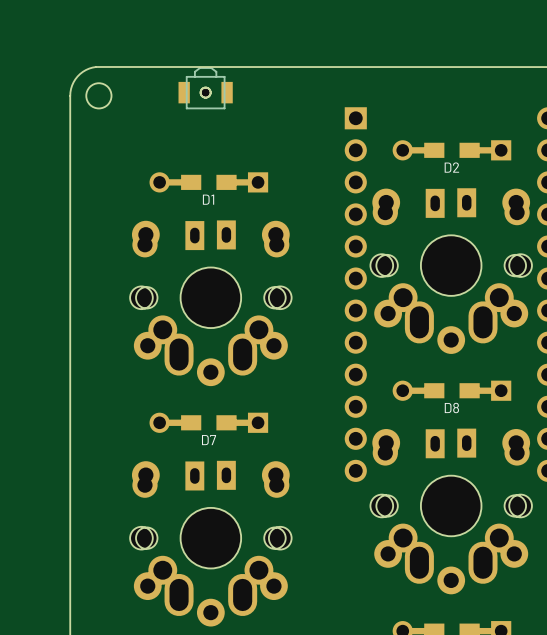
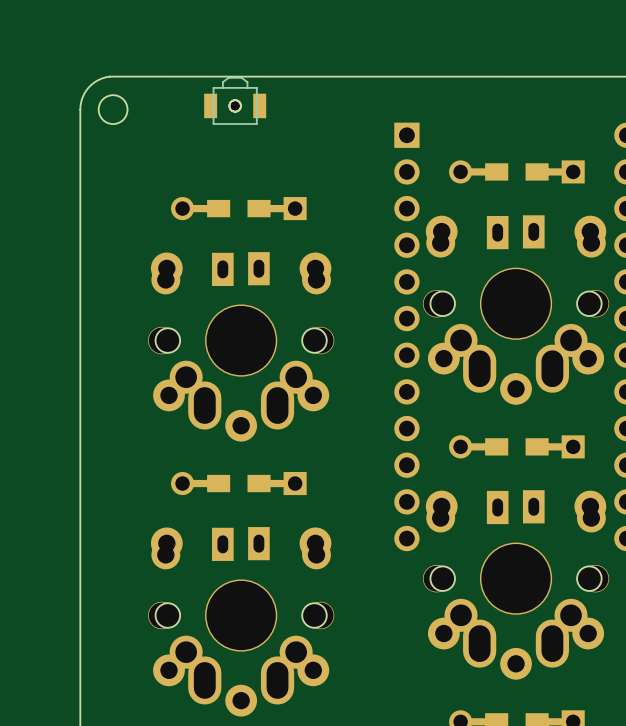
D2 name: D2 (451, 167) -> none
part footprint: [370, 188, 532, 354] -> [422, 215, 610, 405]
D1 name: D1 (208, 199) -> none
part footprint: [130, 220, 292, 387] -> [148, 252, 335, 442]
D8 name: D8 (451, 408) -> none
part footprint: [370, 428, 532, 595] -> [422, 490, 610, 680]
D7 name: D7 (209, 440) -> none
part footprint: [130, 460, 292, 627] -> [148, 527, 335, 717]

